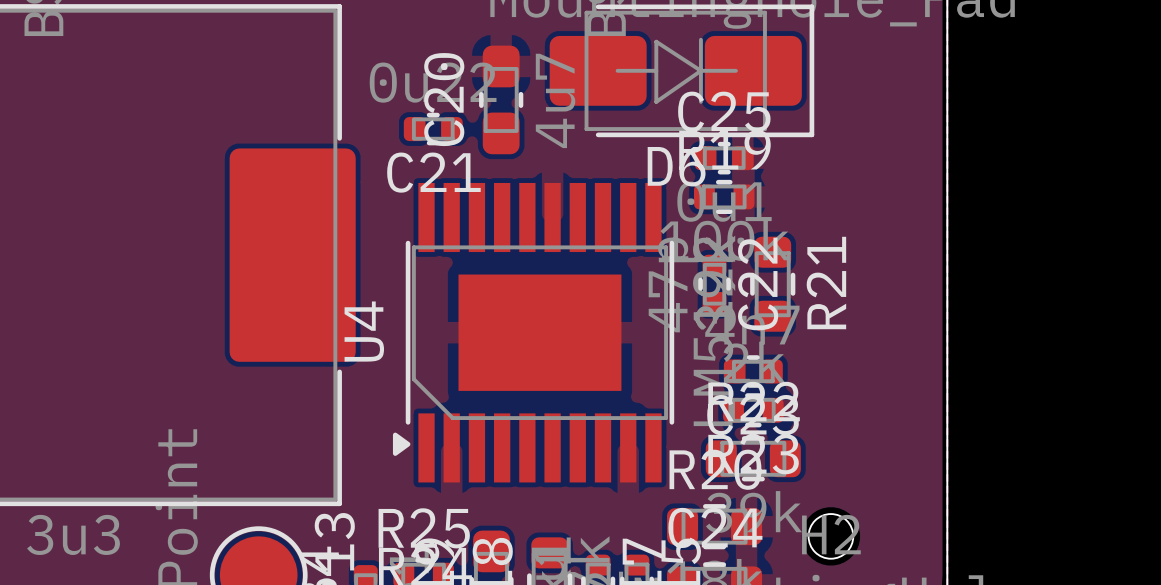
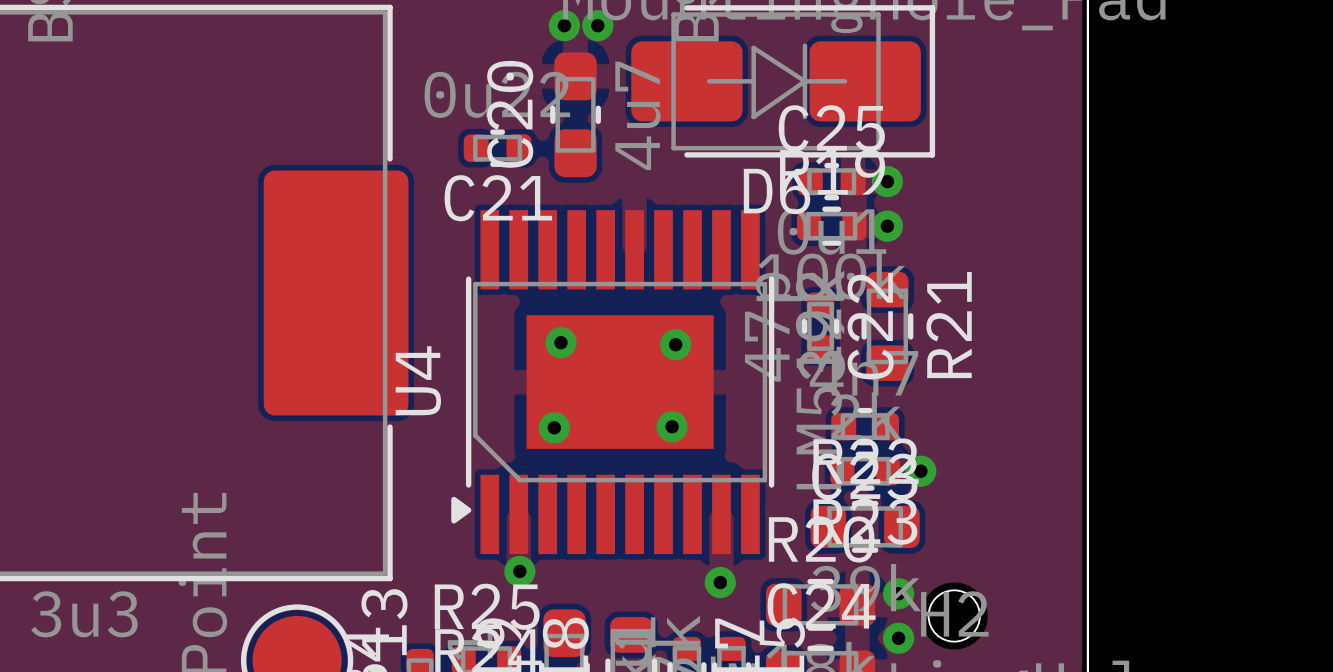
via: none -> (564, 25)
via: none -> (597, 25)
via: none -> (887, 181)
via: none -> (887, 226)
via: none -> (560, 342)
via: none -> (675, 344)
via: none -> (672, 426)
via: none -> (554, 427)
via: none -> (920, 471)
via: none -> (519, 571)
via: none -> (720, 582)
via: none -> (898, 593)
via: none -> (898, 638)

